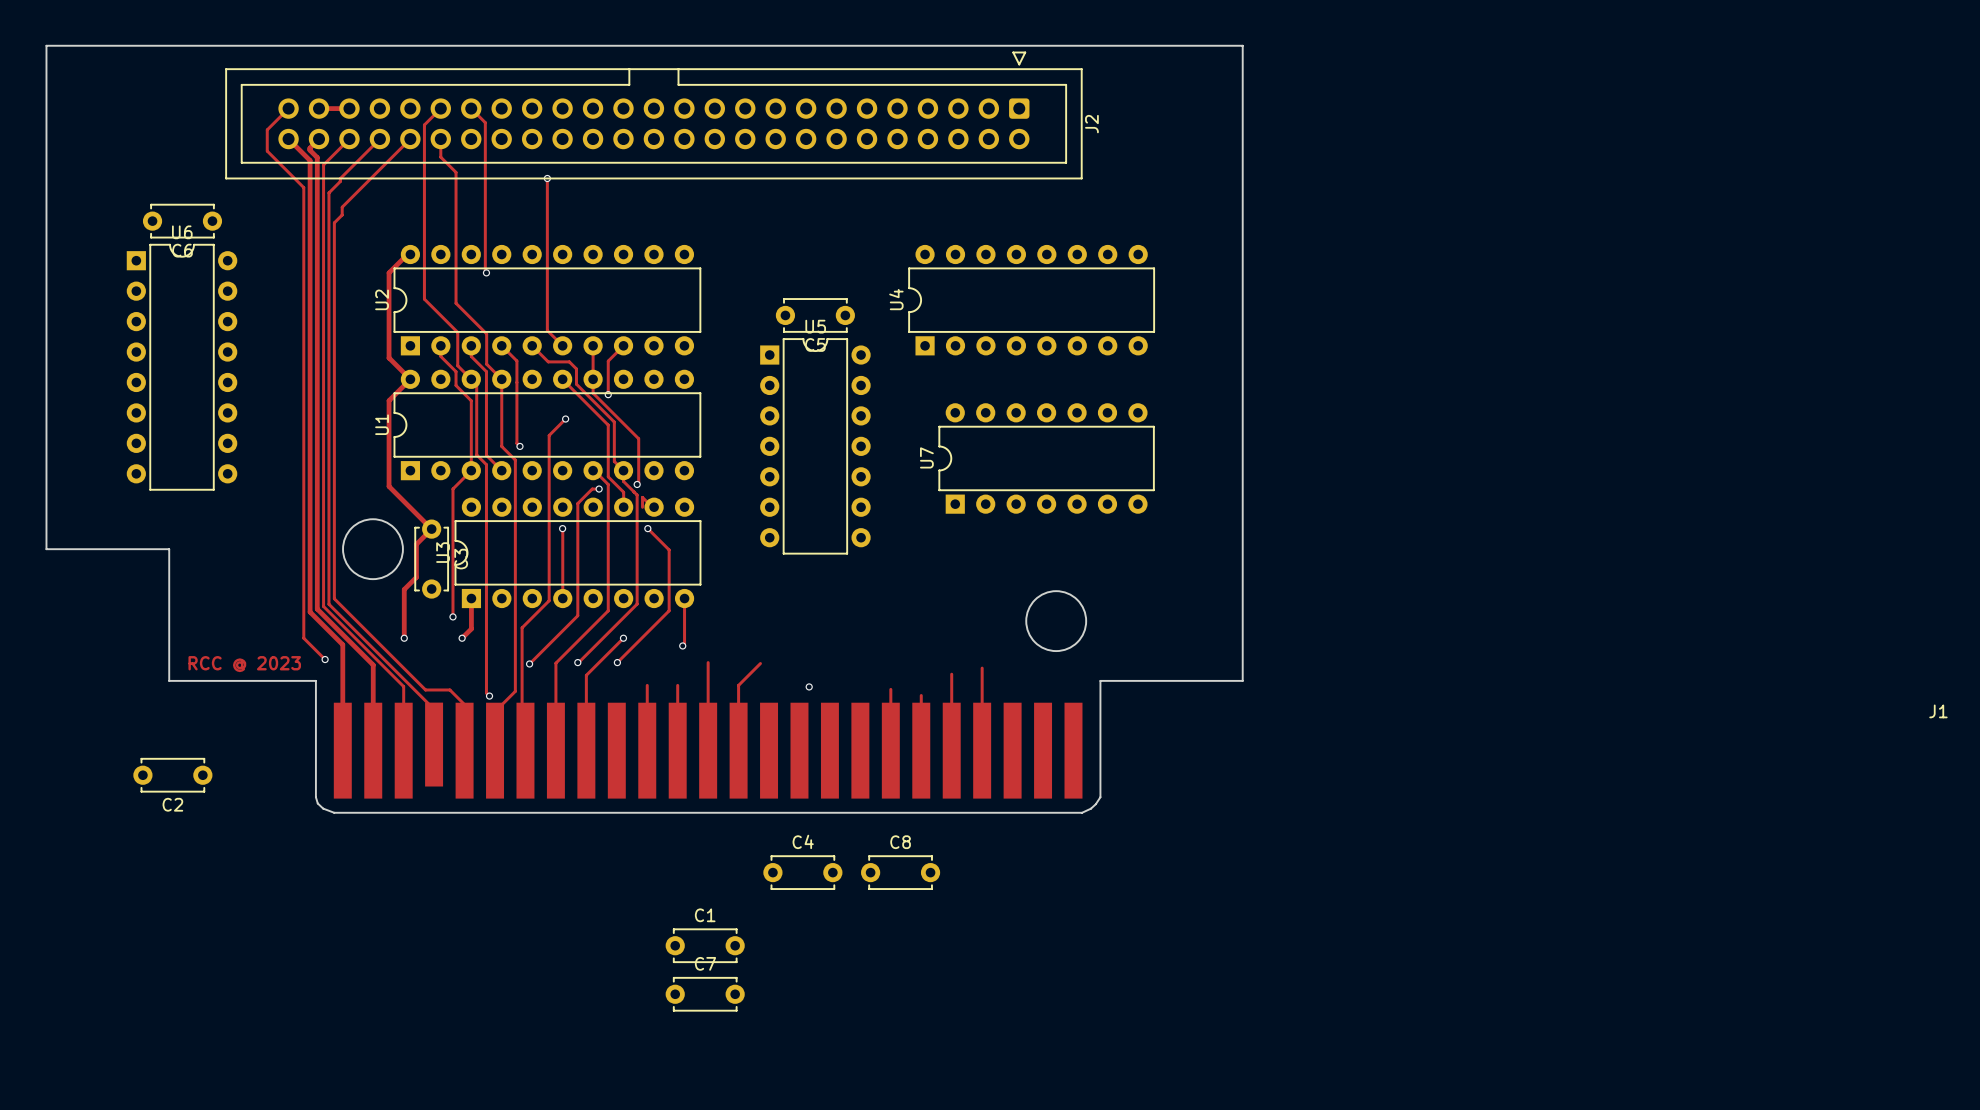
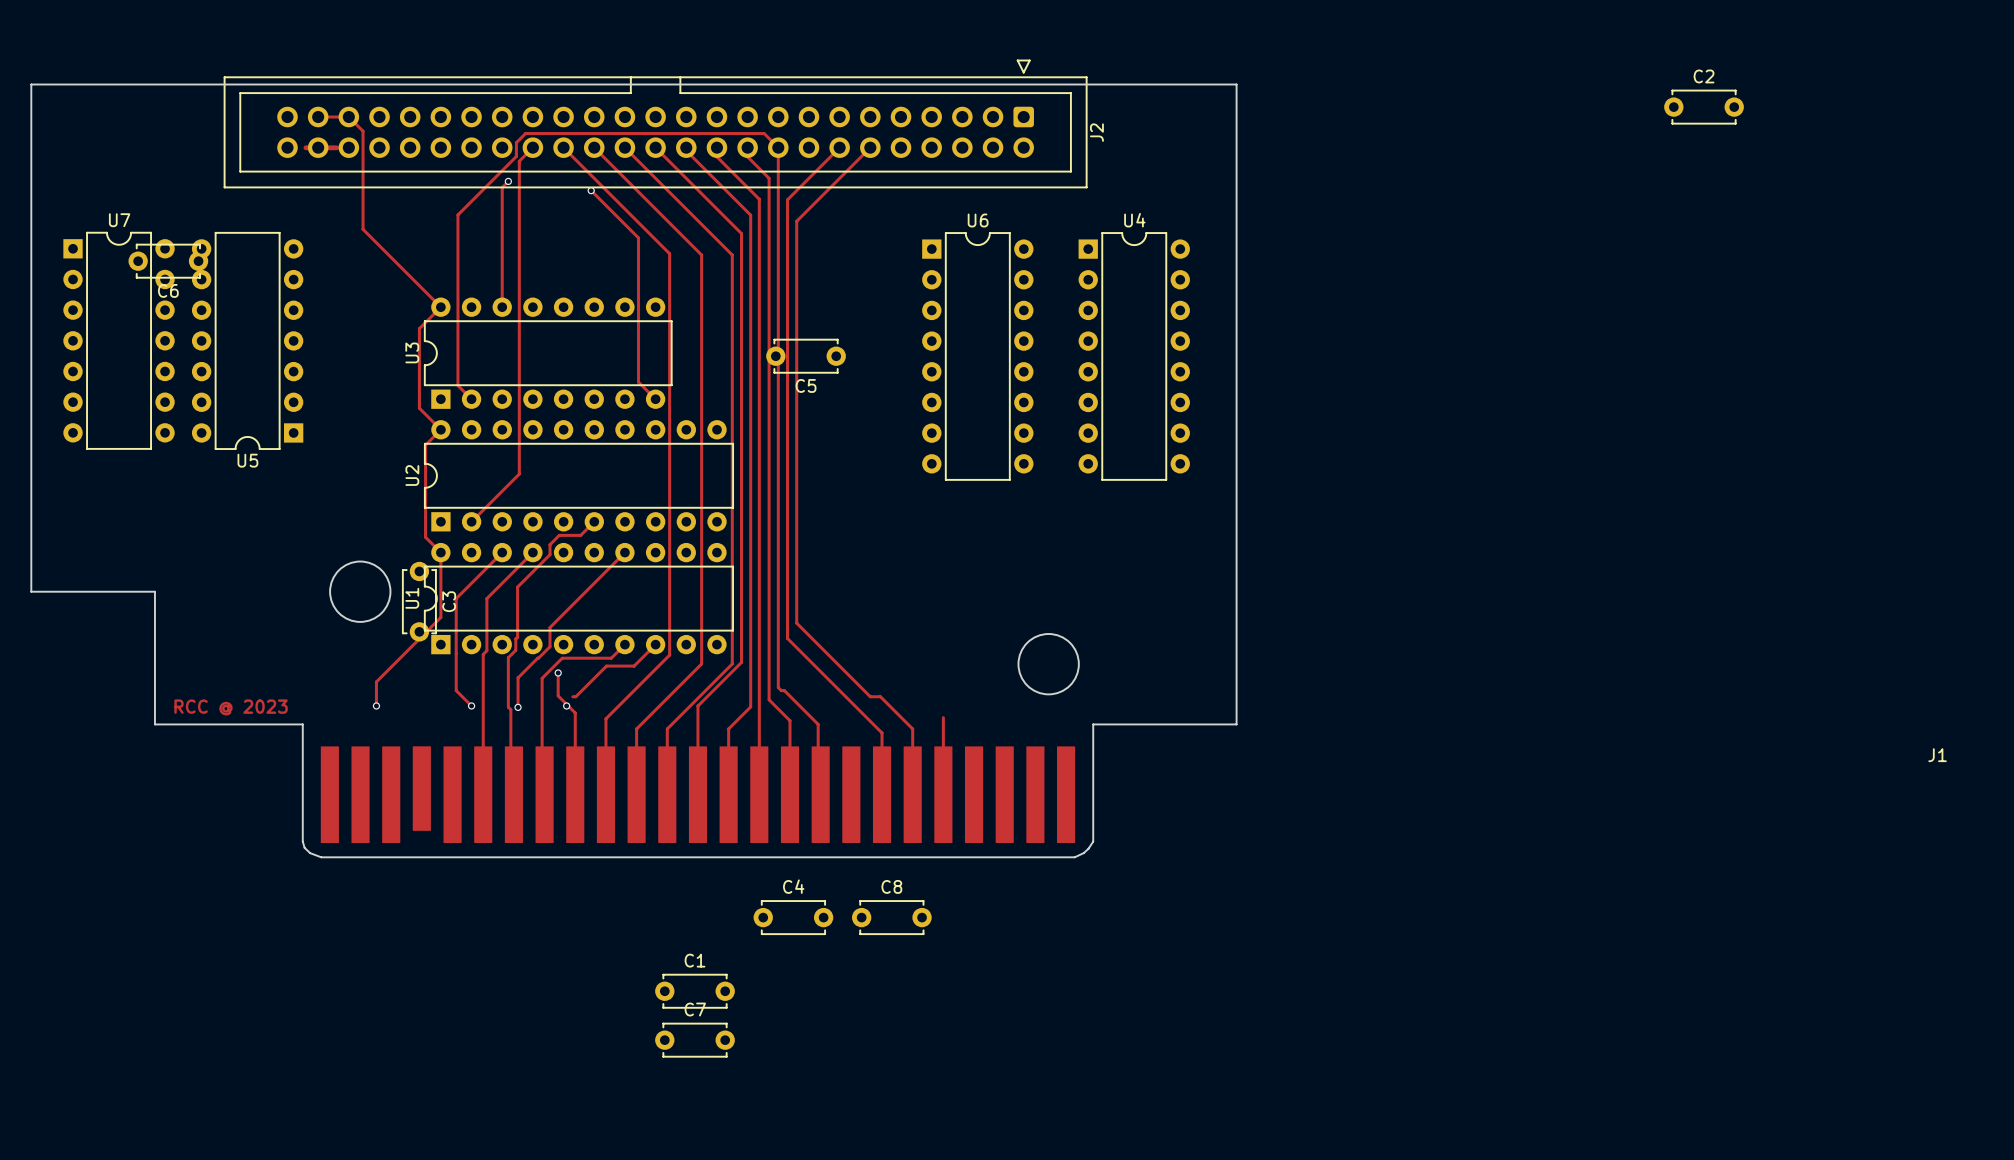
track: (288, 108) (267, 129) (267, 151) (303, 187) (303, 638) (325, 659) -> none
track: (440, 108) (424, 124) (424, 299) (457, 332) (457, 365) (476, 384) (476, 454) (486, 464) (486, 693) (489, 696) -> none
track: (471, 108) (485, 122) (486, 272) -> none
track: none -> (532, 147) (519, 161) (519, 474) (471, 521)
track: none -> (563, 147) (669, 253) (669, 655) (605, 718) (605, 786)
track: none -> (594, 147) (701, 255) (701, 663) (636, 728)
track: none -> (624, 147) (732, 255) (732, 663) (667, 728)
track: none -> (655, 147) (741, 233) (741, 662) (697, 705)
track: none -> (686, 147) (686, 150) (750, 215) (750, 706)
track: none -> (716, 147) (716, 156) (759, 199) (759, 786)
track: none -> (747, 147) (747, 156) (769, 178) (769, 699) (790, 720) (790, 786)
track: none -> (839, 147) (787, 199) (787, 638) (882, 733)
track: none -> (870, 147) (796, 221) (796, 623) (870, 696) (880, 696) (912, 728) (912, 739)
J2 position: (653, 115) -> (655, 123)
track: (288, 139) (310, 160) (310, 612) (342, 644) (342, 750) -> none
track: (319, 139) (309, 148) (317, 157) (317, 609) (373, 665) (373, 750) -> none
track: (349, 139) (323, 164) (323, 606) (403, 686) (403, 750) -> none
track: (379, 139) (340, 178) (340, 181) (328, 192) (328, 604) (434, 709) (434, 744) -> none
track: (410, 139) (342, 207) (342, 215) (334, 222) (334, 598) (425, 689) (449, 689) (464, 704) (464, 750) -> none
track: (440, 139) (440, 157) (456, 172) (456, 303) (486, 333) (486, 364) (501, 379) (501, 446) (515, 460) (515, 691) (495, 711) -> (532, 552) (486, 598) (486, 650) (483, 654) (483, 755)
track: none -> (508, 181) (502, 187) (502, 307)
via: none -> (508, 181)
track: none -> (591, 190) (638, 237) (638, 382) (655, 399)
via: none -> (591, 190)
track: (547, 178) (547, 330) (562, 345) -> none
via: (547, 178) -> none
track: (410, 254) (407, 254) (389, 272) (389, 358) -> none
via: (486, 272) -> none
U2 position: (547, 300) -> (578, 475)
U4 rotation: 0° (1031, 300) -> 90° clockwise (1134, 356)
track: (440, 345) (440, 356) (456, 371) (456, 385) (471, 400) (471, 470) (452, 488) (452, 510) -> (318, 117) (348, 117) (363, 131) (363, 229) (440, 307) (419, 328) (419, 408) (440, 429) (425, 445) (425, 537) (440, 552)
track: (471, 345) (471, 356) (486, 371) (486, 455) (501, 470) -> none
track: (501, 345) (516, 360) (516, 443) (519, 446) -> none
track: (532, 345) (548, 361) (569, 361) (576, 368) (576, 384) (614, 422) (614, 461) (623, 470) (623, 481) (637, 495) (637, 604) (577, 662) -> none
track: (593, 345) (593, 393) (638, 438) (637, 484) -> none
track: (623, 345) (608, 361) (608, 394) -> none
track: (389, 358) (410, 379) (389, 400) (389, 486) (431, 529) (416, 544) (416, 577) (404, 589) (404, 638) -> none
track: none -> (471, 399) (457, 385) (457, 214) (516, 156) (516, 142) (525, 133) (764, 133) (778, 147) (778, 687) (784, 690) (818, 724) (818, 783)
U6 position: (182, 367) -> (977, 356)
track: (562, 379) (608, 425) (608, 476) (623, 492) (623, 507) -> none
via: (608, 394) -> none
track: (565, 419) (549, 435) (549, 600) (522, 627) (522, 747) (525, 750) -> none
via: (565, 419) -> none
U1 position: (547, 424) -> (578, 598)
via: (519, 446) -> none
U5 rotation: 0° (815, 446) -> 180° (247, 340)
U5 position: (815, 446) -> (247, 340)
U7 rotation: 0° (1046, 458) -> 90° clockwise (119, 340)
U7 position: (1046, 458) -> (119, 340)
track: (593, 470) (608, 484) (608, 610) (555, 663) (555, 750) -> none
track: none -> (594, 521) (580, 535) (559, 535) (549, 544) (549, 554) (517, 587) (517, 637) (515, 638) (515, 650) (508, 657) (510, 783)
via: (637, 484) -> none
track: (599, 489) (592, 489) (577, 503) (577, 615) (529, 663) -> (624, 552) (549, 627) (549, 646) (518, 677) (518, 707)
via: (599, 489) -> none
track: (654, 507) (642, 497) (642, 507) -> none
track: none -> (502, 552) (456, 598) (456, 690) (471, 705)
track: (562, 528) (562, 598) -> none
via: (562, 528) -> none
track: (647, 528) (669, 549) (669, 610) (617, 662) -> none
via: (647, 528) -> none
U3 position: (577, 552) -> (548, 353)
track: (452, 574) (452, 616) -> (440, 617) (376, 681) (376, 705)
track: (471, 598) (471, 628) (462, 638) -> none
track: (684, 598) (684, 644) (682, 645) -> none
track: none -> (624, 644) (611, 658) (562, 658) (542, 678) (542, 783)
track: none -> (655, 644) (634, 666) (606, 666) (575, 696) (572, 696)
via: (452, 616) -> none
via: none -> (558, 672)
via position: (404, 638) -> (376, 705)
via: (462, 638) -> none
track: (623, 638) (586, 675) -> (558, 672) (558, 695) (575, 713) (575, 718)
via: (623, 638) -> none
via: (682, 645) -> none
via: (325, 659) -> none
via: none -> (471, 705)
via: (617, 662) -> none
track: (982, 668) (982, 750) -> none
via: (809, 686) -> none
via: (489, 696) -> none
C2 position: (172, 775) -> (1704, 107)
C2 name position: C2 (172, 804) -> C2 (1704, 76)

